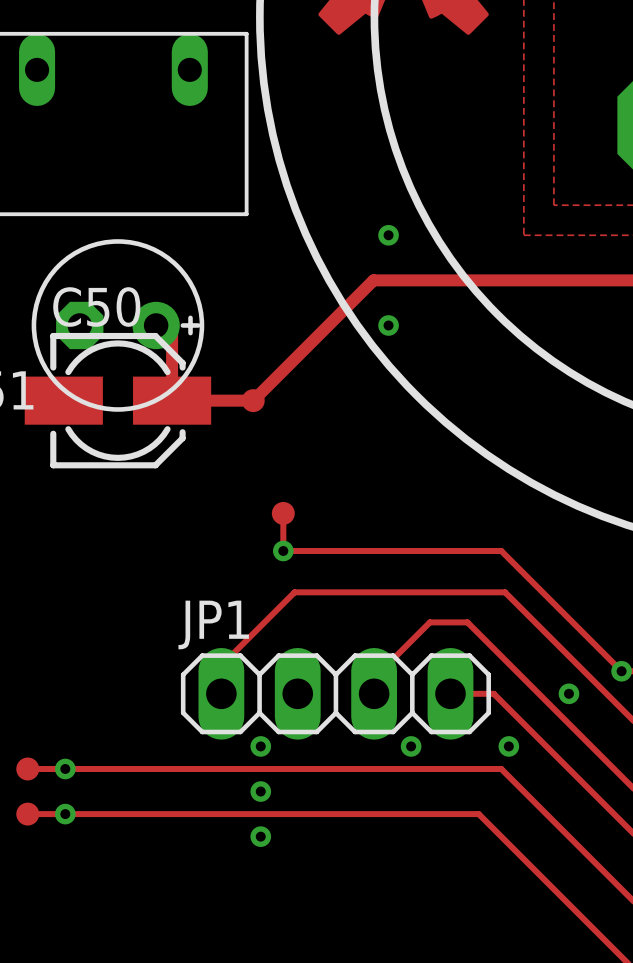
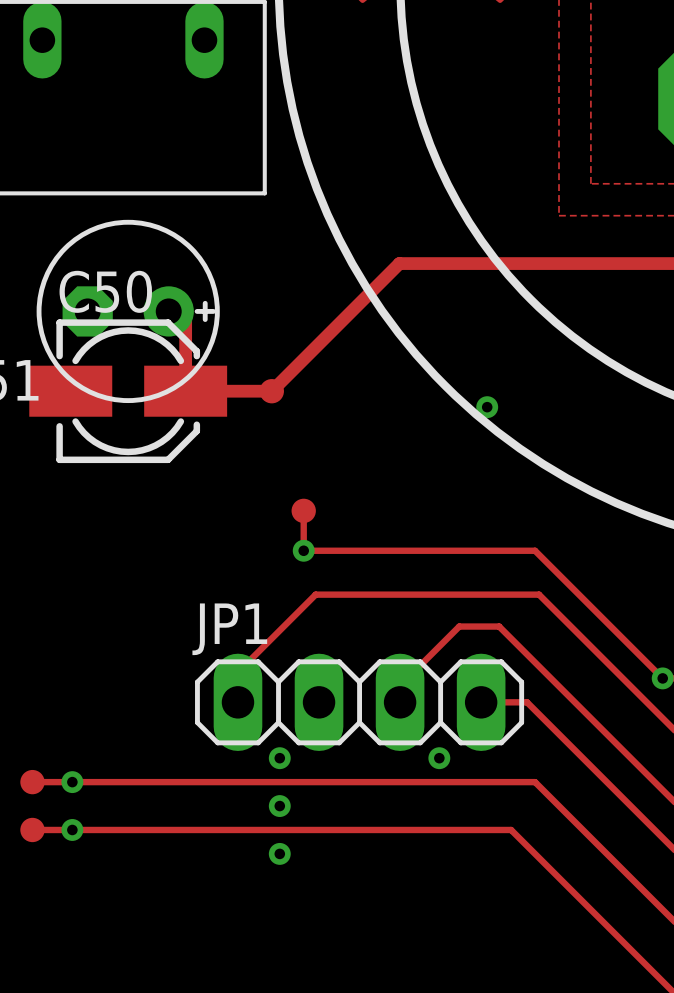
via: (388, 235) -> none
via: (388, 325) -> none
via: none -> (487, 407)
via: (568, 693) -> none
via: (508, 746) -> none

